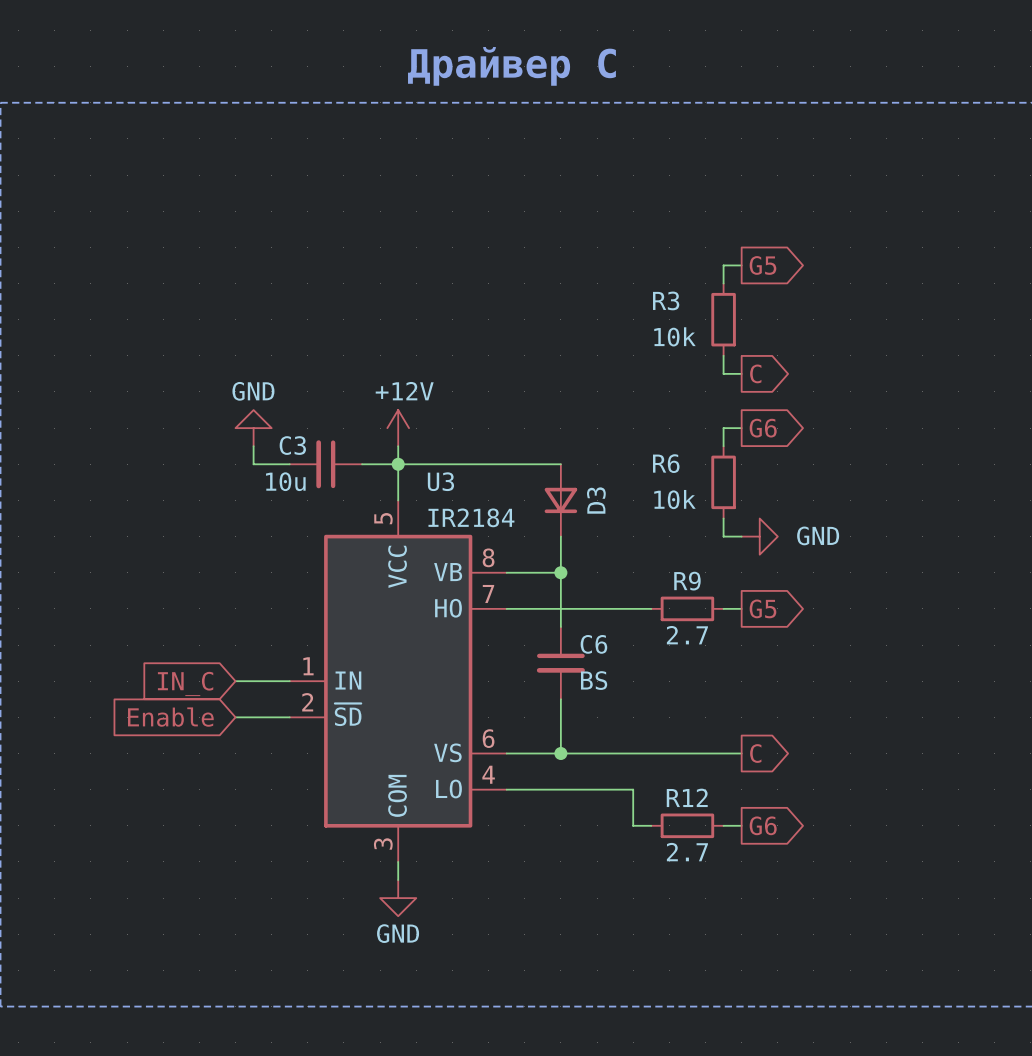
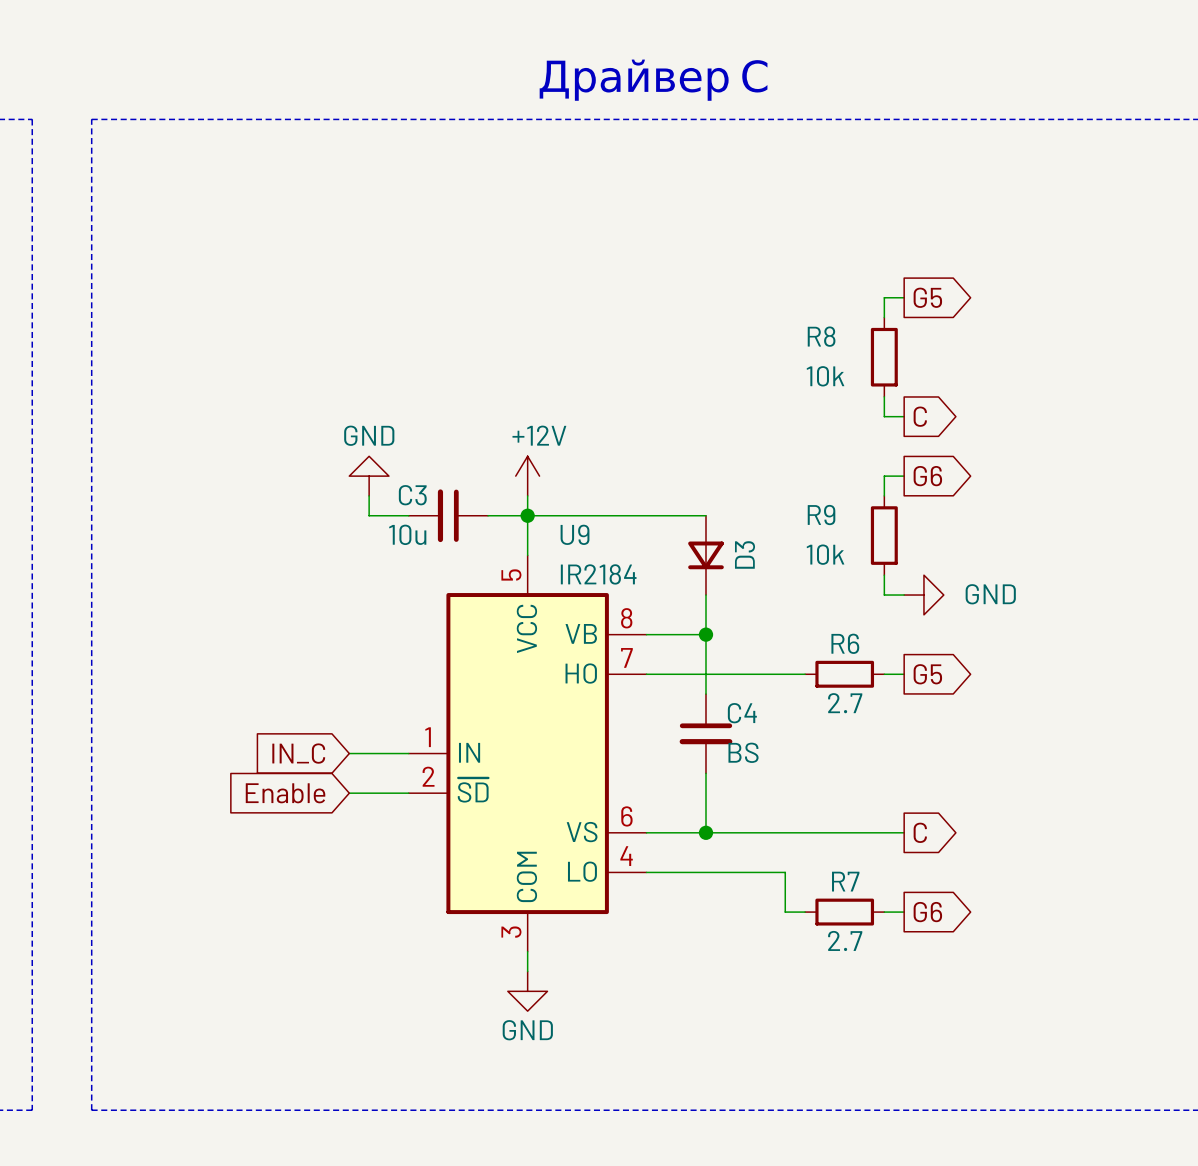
R3 name: R3 (666, 300) -> R8 (821, 336)
R6 name: R6 (666, 463) -> R9 (821, 515)
U3 name: U3 (440, 481) -> U9 (575, 534)
R9 name: R9 (687, 581) -> R6 (845, 643)
C6 name: C6 (593, 644) -> C4 (742, 713)
R12 name: R12 (687, 797) -> R7 (845, 881)

